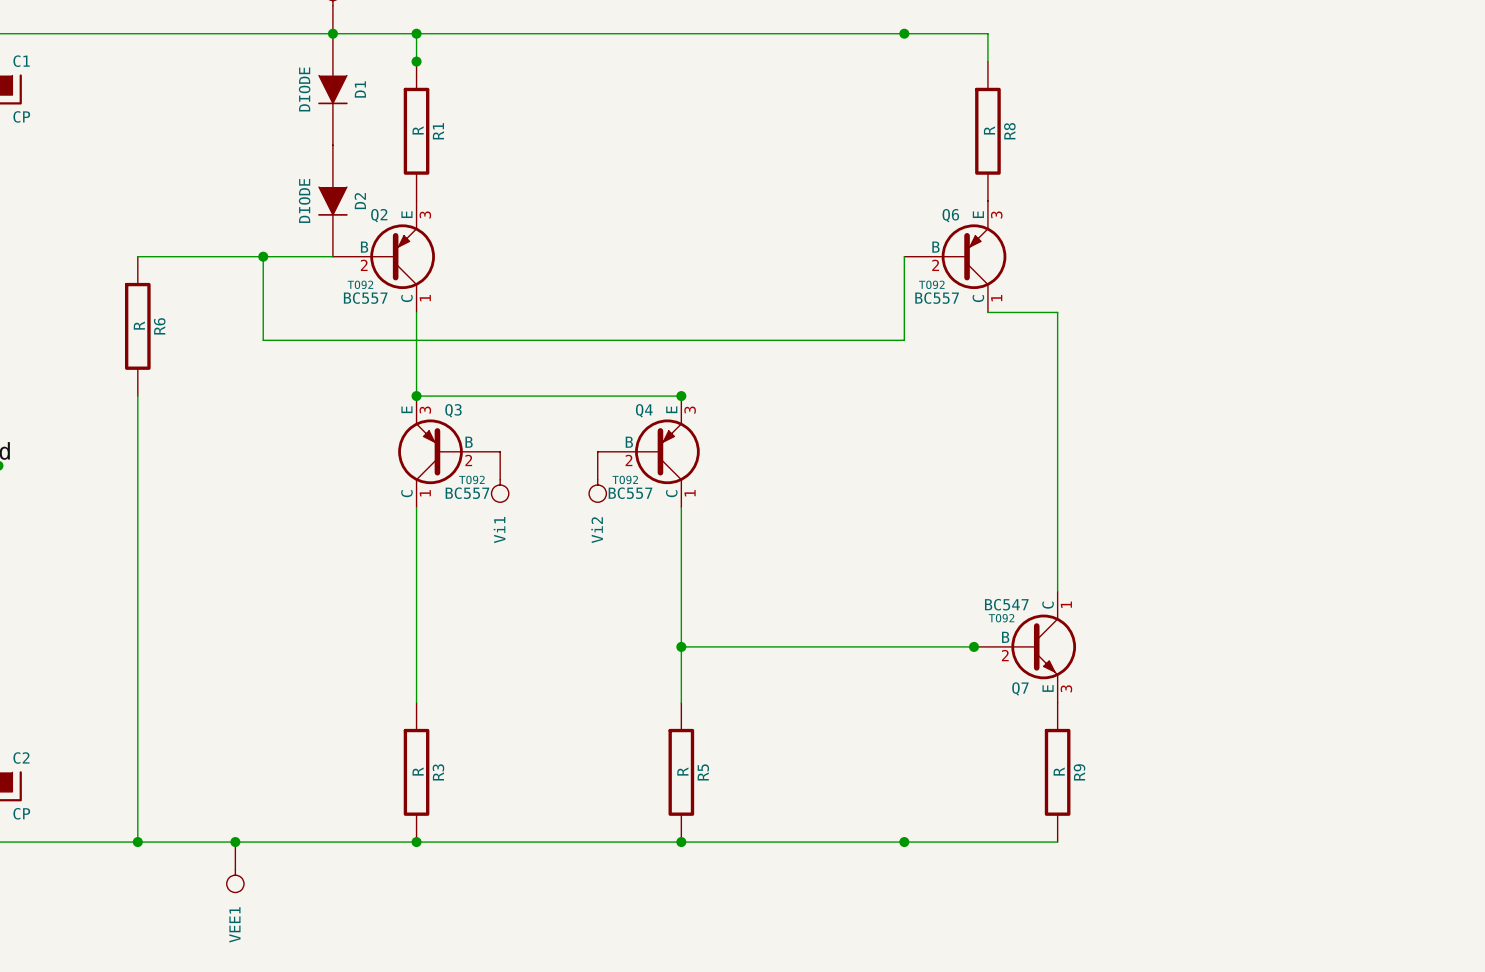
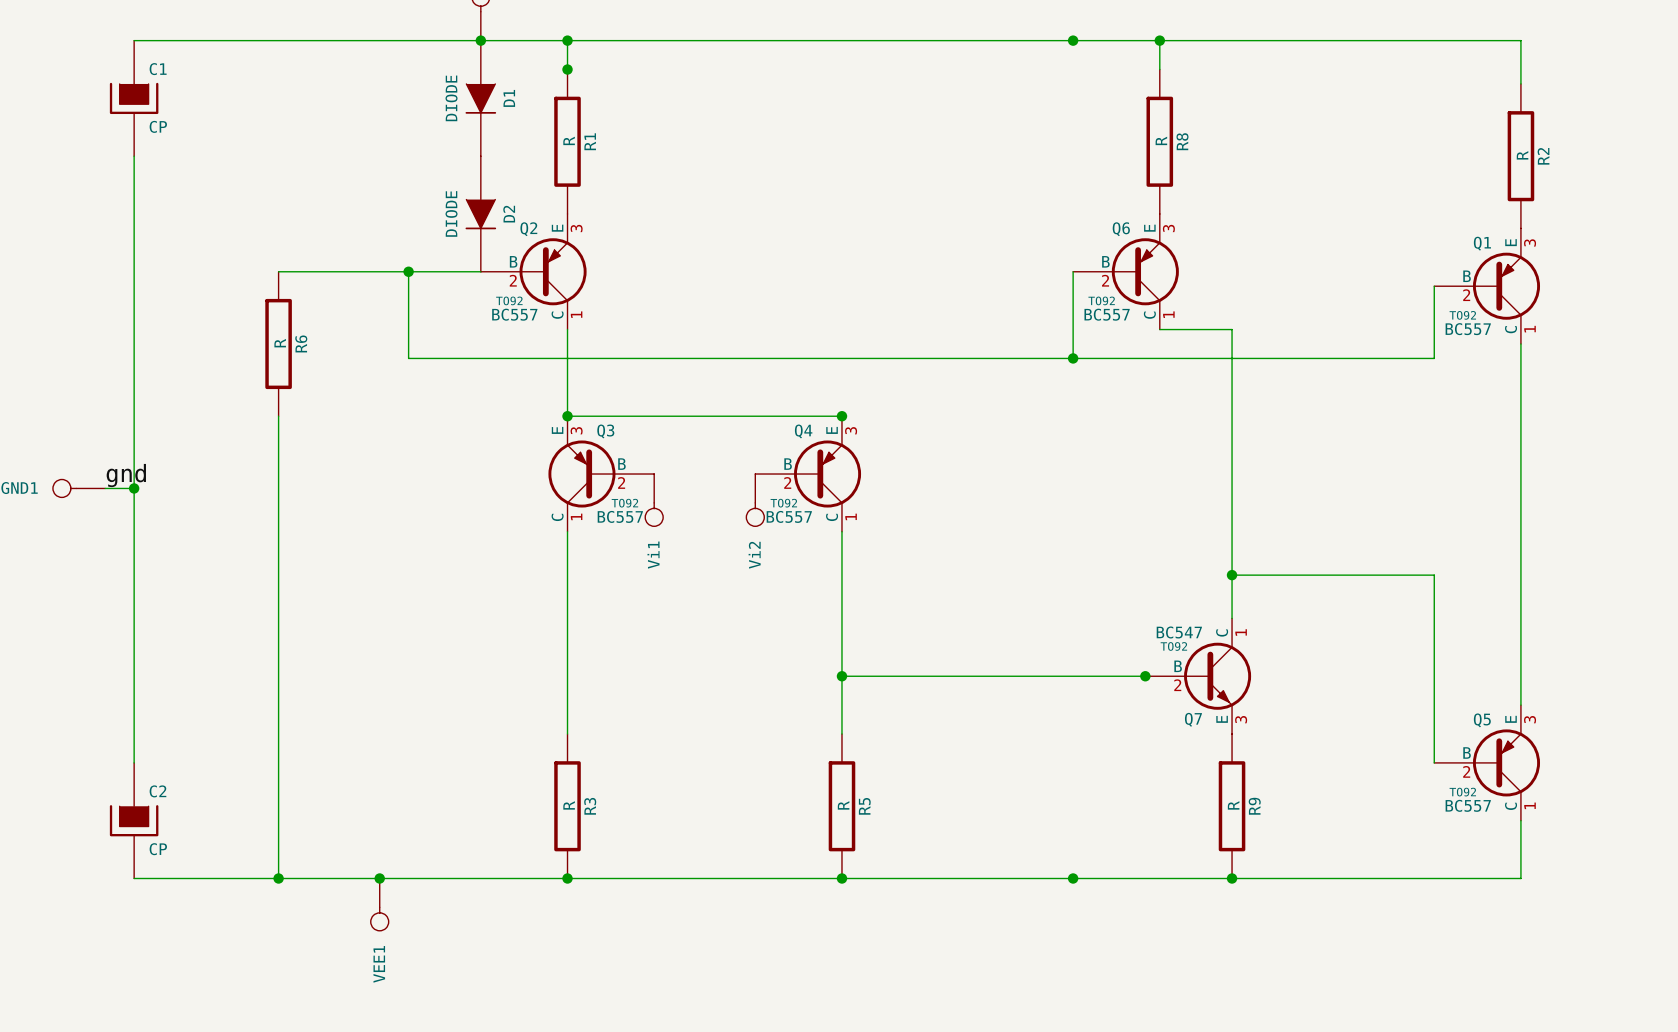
wire: none -> (1159, 40) (1520, 40) (1520, 83)
junction: none -> (1159, 40)
R2: none -> R (1520, 156)
wire: none -> (1434, 286) (1434, 358) (1073, 358)
Q1: none -> BC557 (1487, 286)
wire: none -> (1520, 343) (1520, 705)
junction: none -> (1073, 358)
wire: none -> (1232, 575) (1434, 575) (1434, 762)
junction: none -> (1232, 575)
Q5: none -> BC557 (1487, 762)
wire: none -> (1520, 820) (1520, 878) (1232, 878)
junction: none -> (1232, 878)

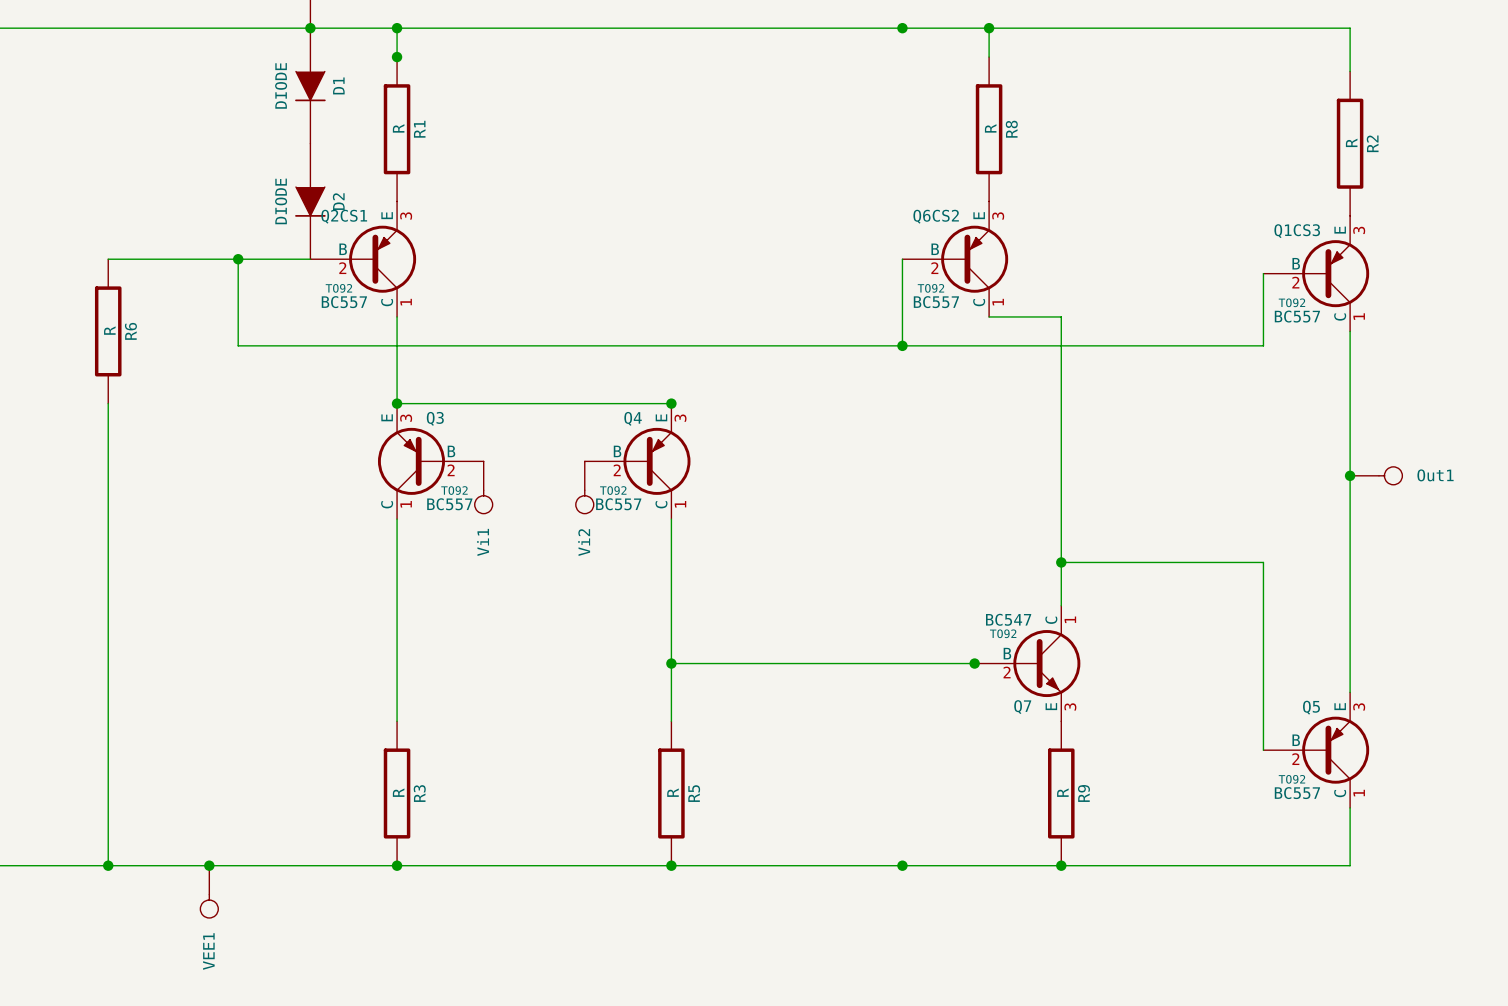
Q2 name: Q2 (528, 229) -> Q2CS1 (344, 216)
Q6 name: Q6 (1121, 229) -> Q6CS2 (936, 216)
Q1 name: Q1 (1482, 243) -> Q1CS3 (1297, 231)
junction: none -> (1350, 475)
Out1: none -> (1376, 475)

